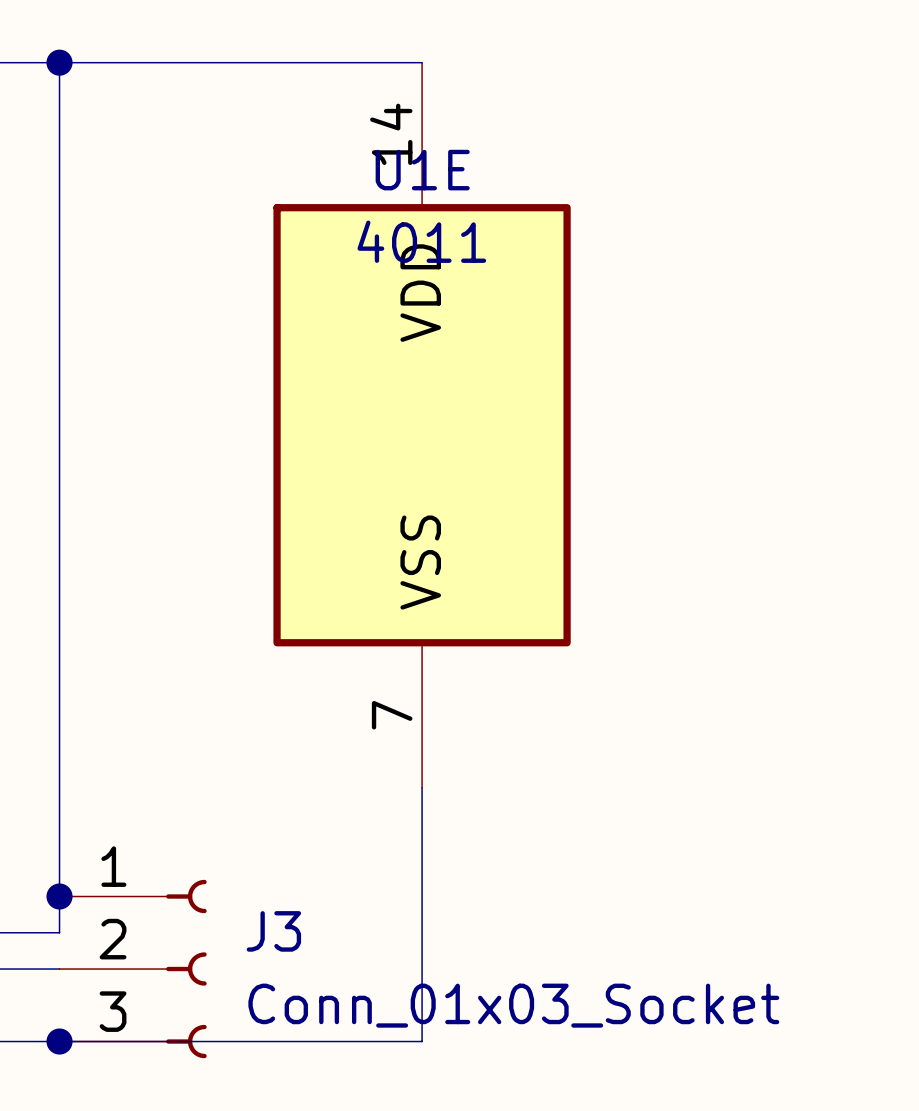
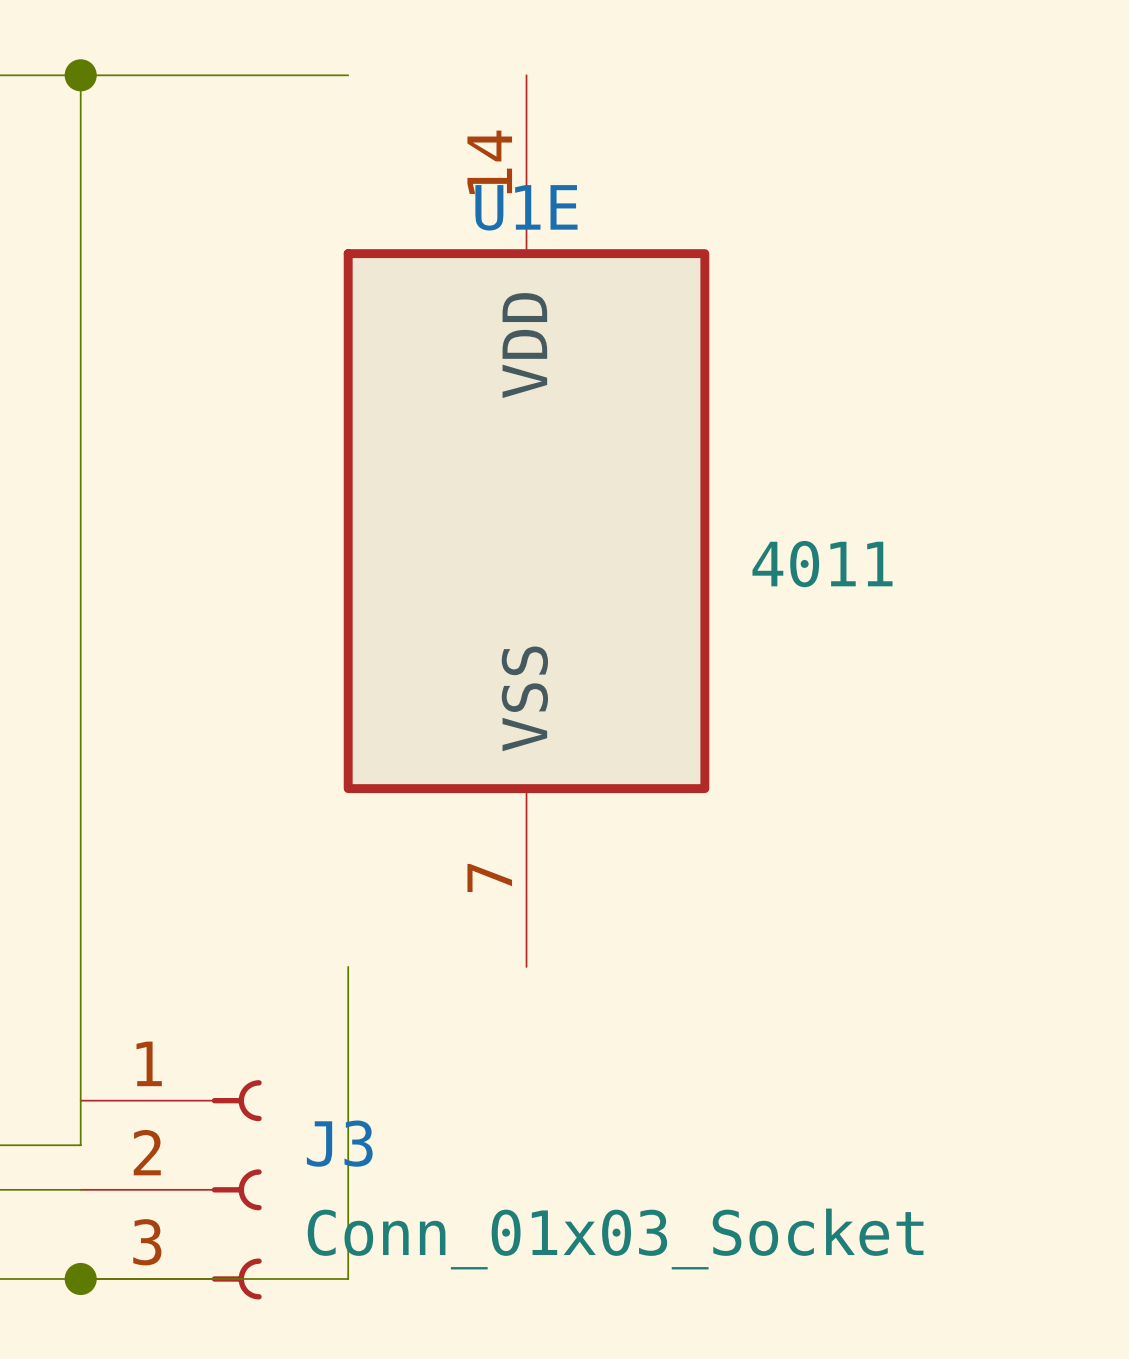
wire: (277, 62) (422, 62) -> none
U1E value position: 4011 (421, 241) -> 4011 (822, 564)
wire: (422, 787) (422, 1041) (277, 1041) -> (348, 966) (348, 1278)
junction: (59, 896) -> none

